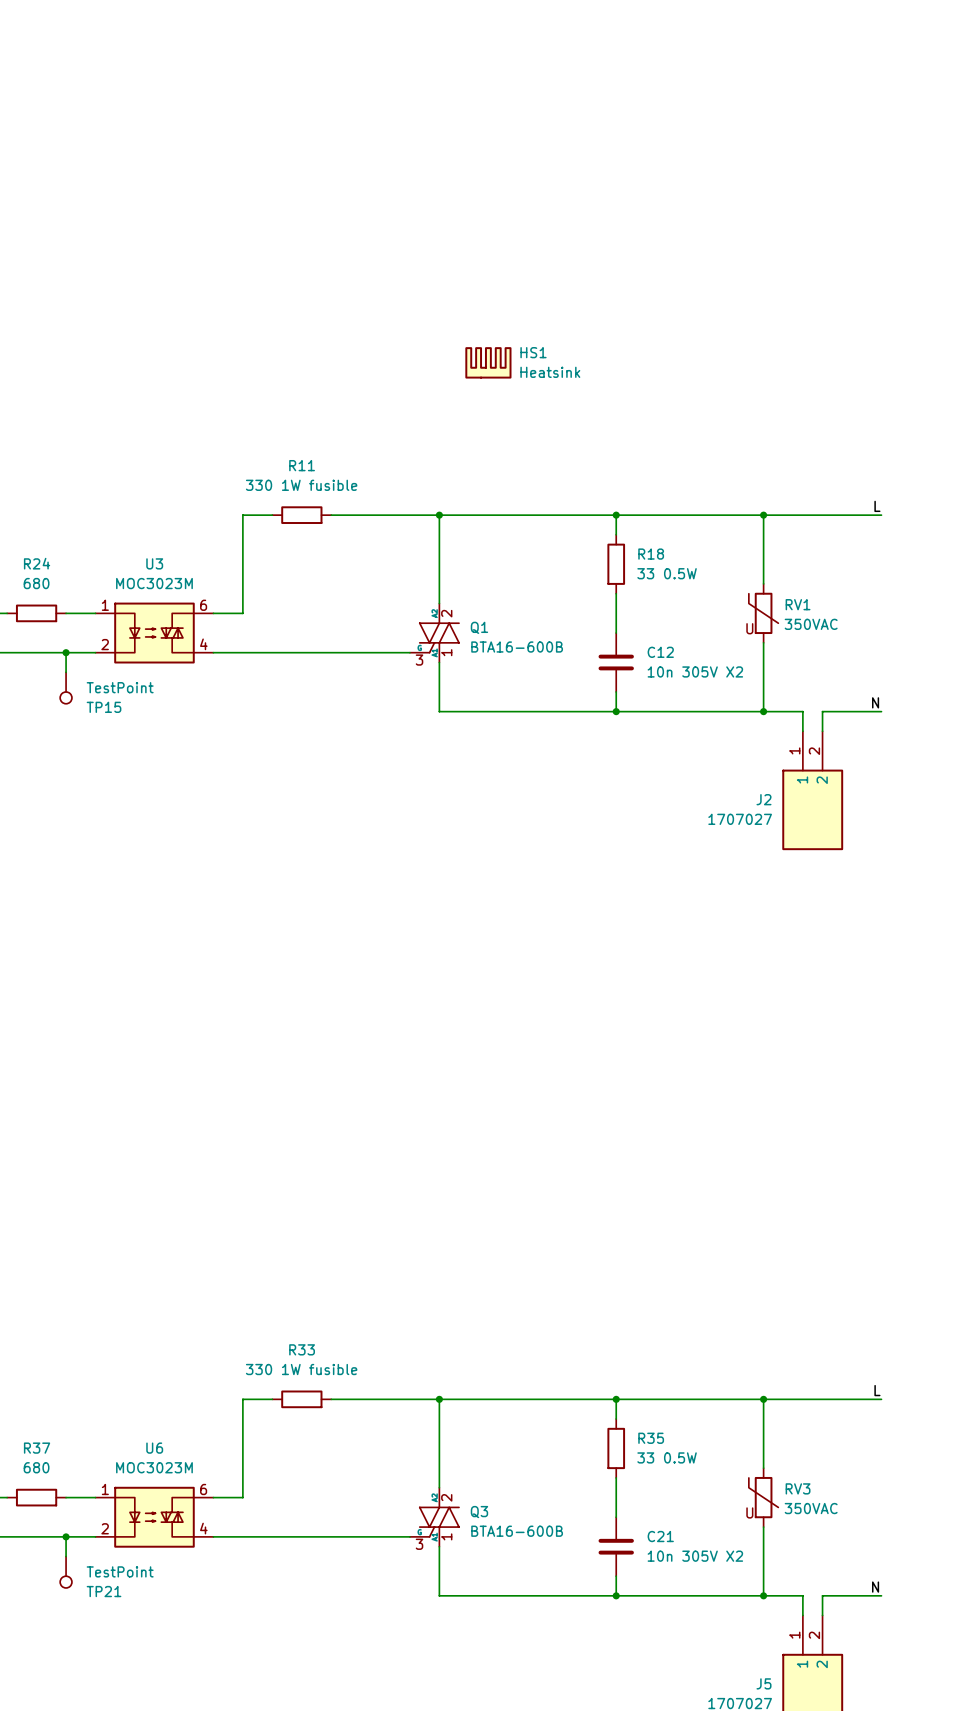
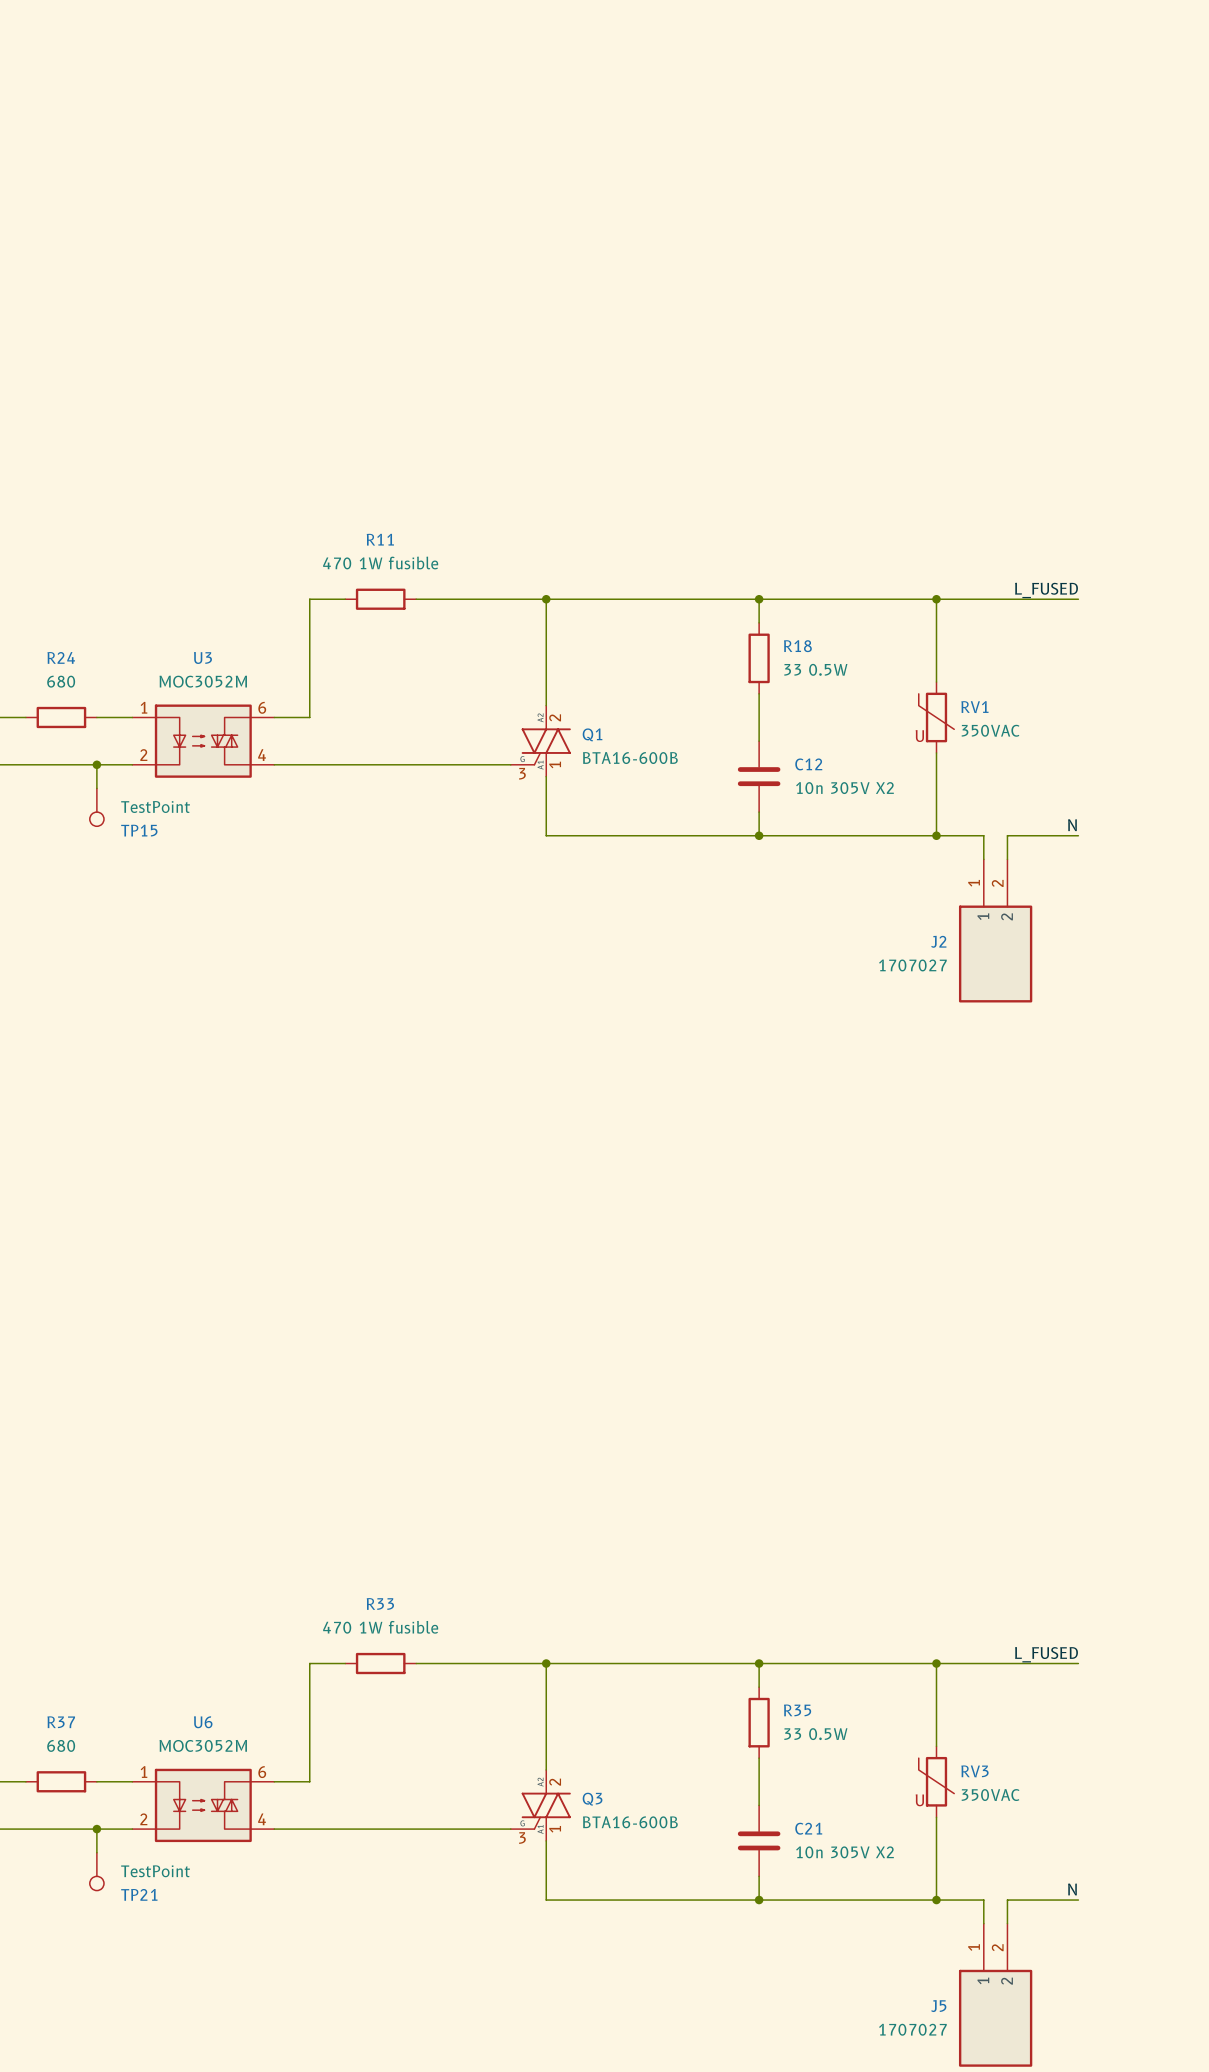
HS1: Heatsink (488, 362) -> none
R11 value: 330 1W fusible (301, 485) -> 470 1W fusible (380, 563)
label: L (877, 506) -> L_FUSED (1046, 590)
U3 value: MOC3023M (154, 583) -> MOC3052M (203, 681)
R33 value: 330 1W fusible (301, 1369) -> 470 1W fusible (380, 1627)
label: L (877, 1390) -> L_FUSED (1046, 1654)
U6 value: MOC3023M (154, 1467) -> MOC3052M (203, 1745)

